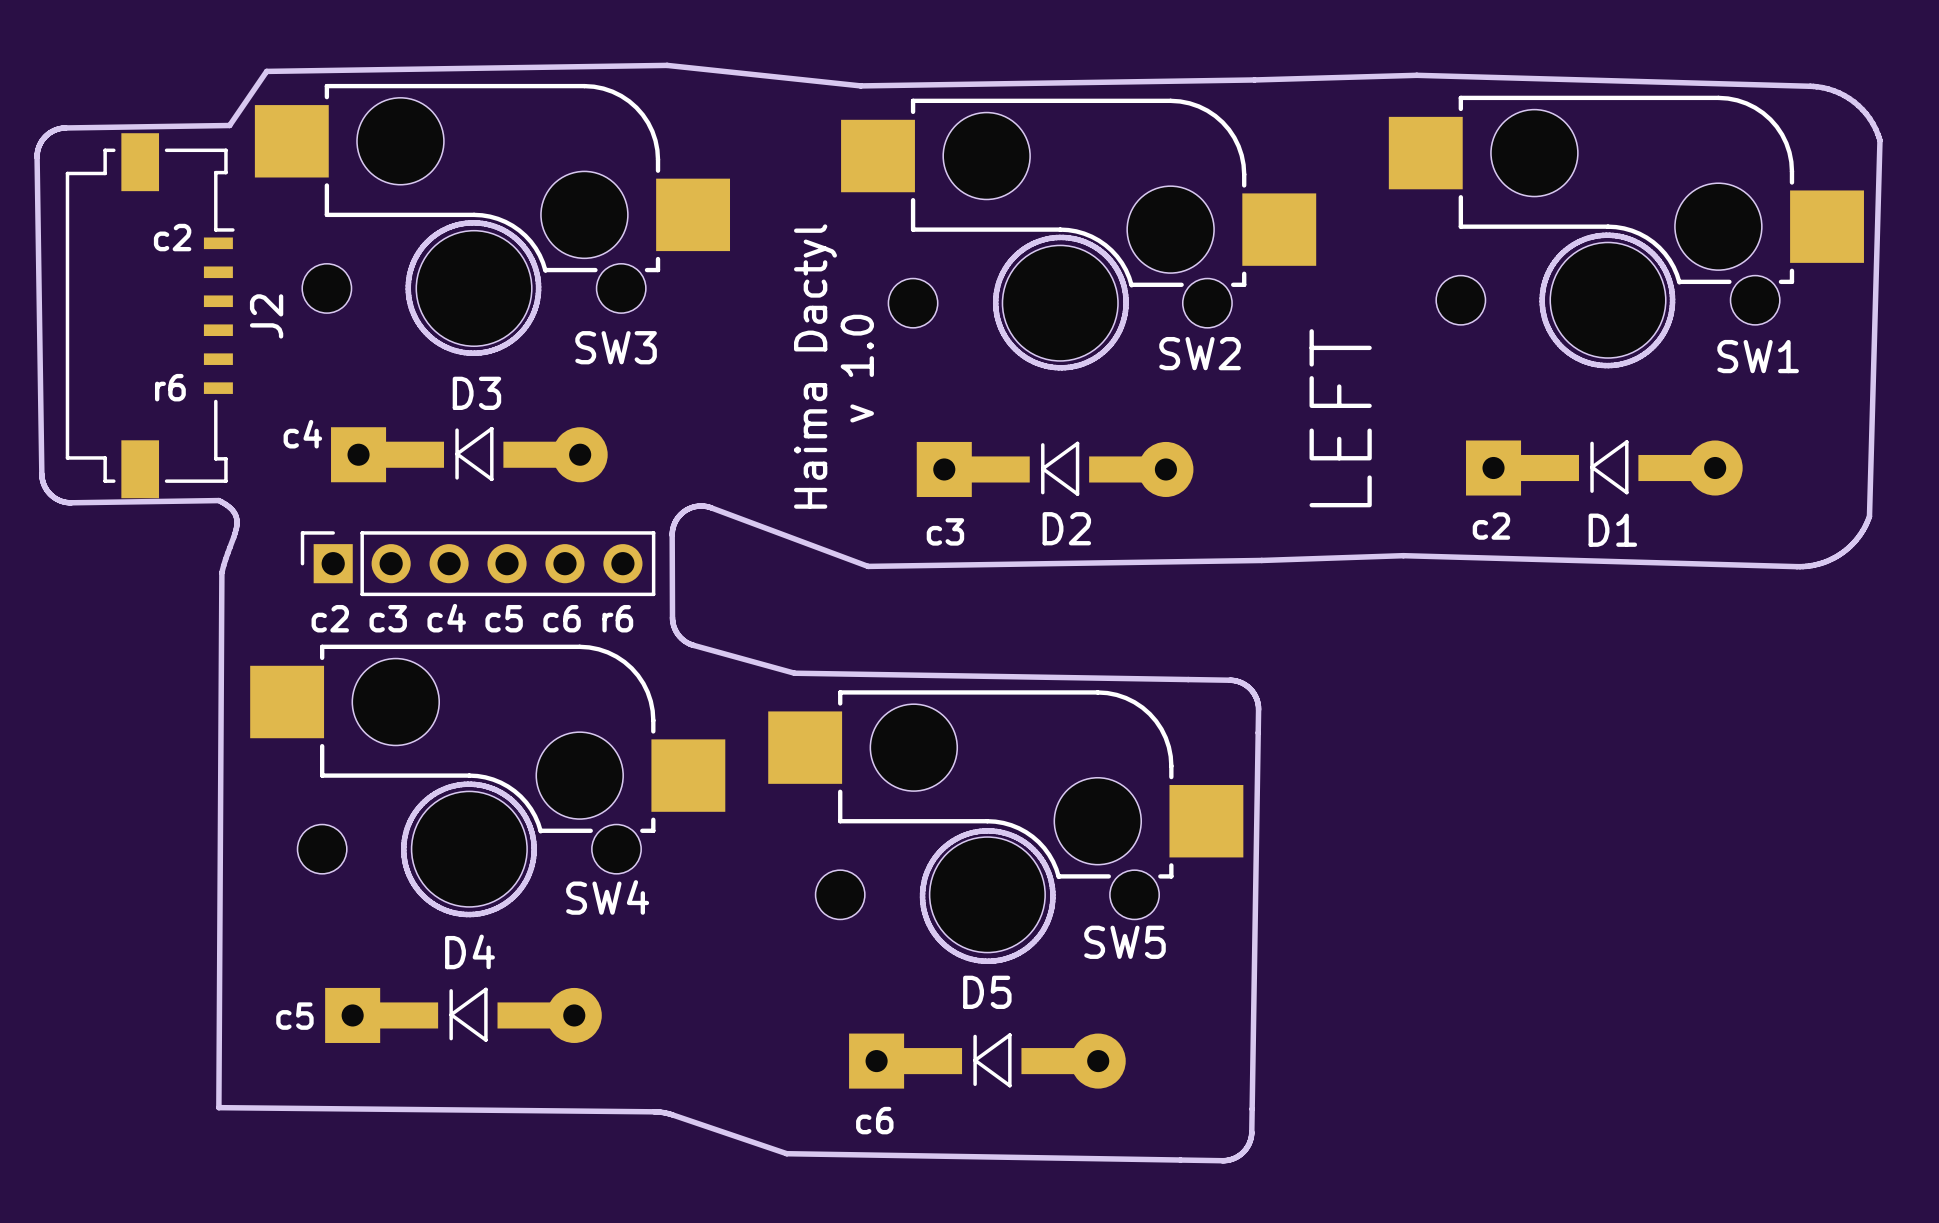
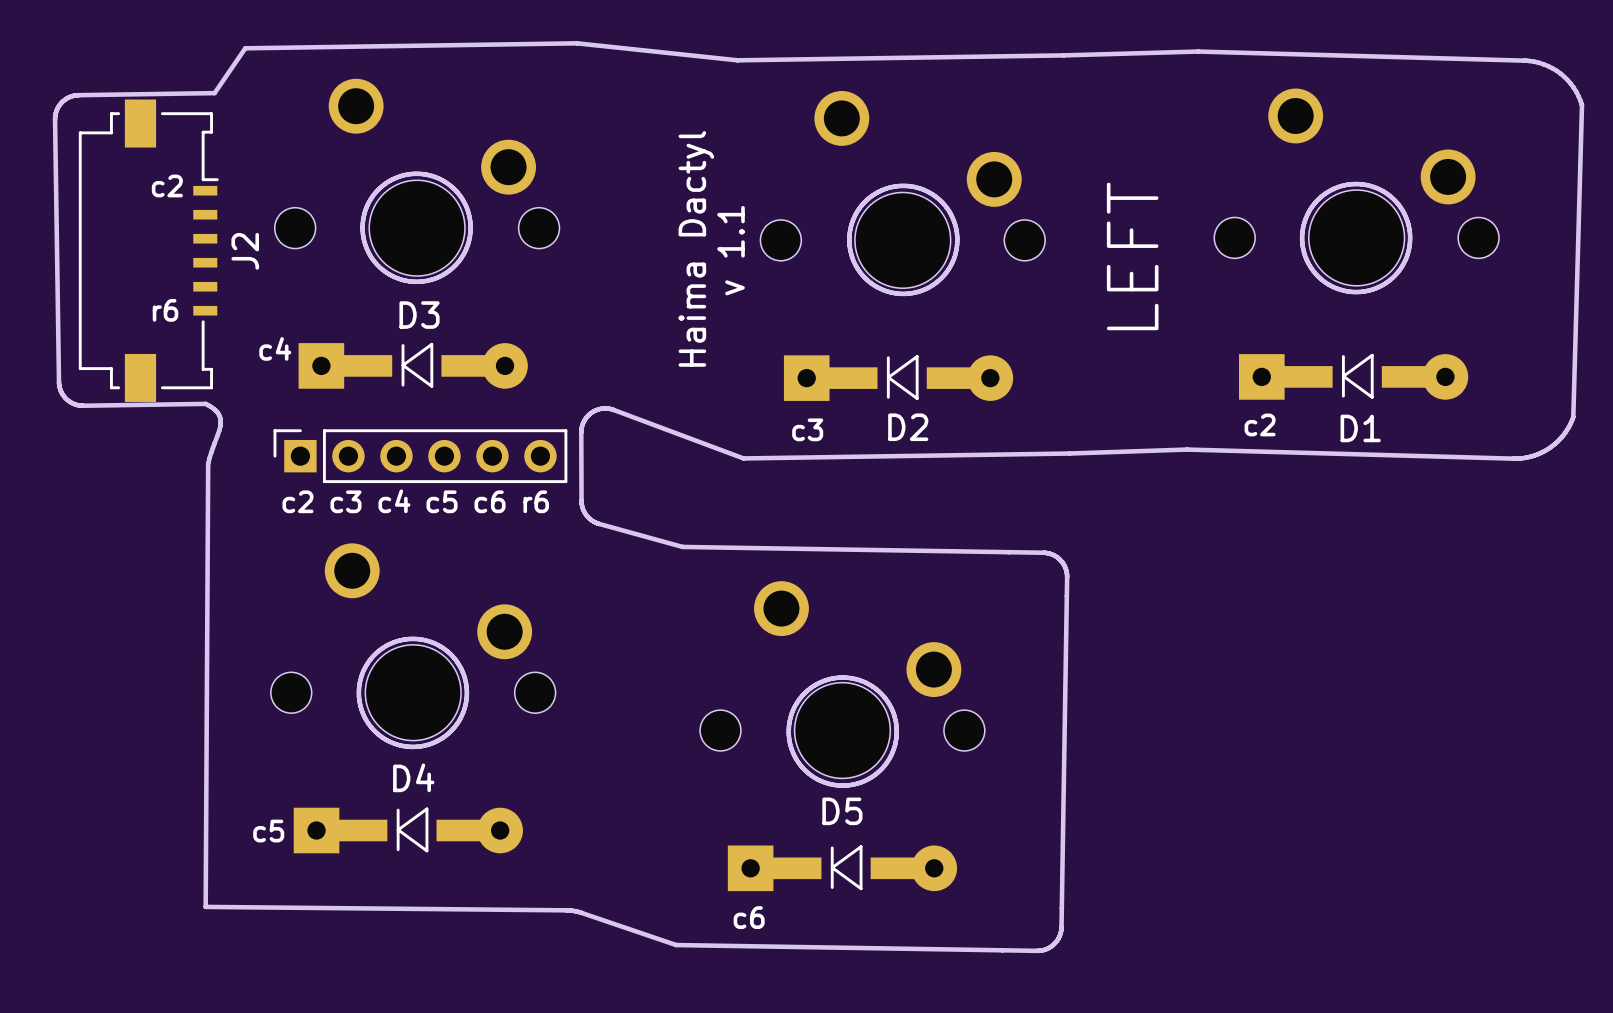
SW3: (492, 215) -> none
SW1: (1626, 226) -> none
part: none -> (417, 177)
SW2: (1078, 229) -> none
part: none -> (1356, 187)
part: none -> (902, 189)
text position: Haima Dactyl (815, 366) -> Haima Dactyl (696, 248)
text: v 1.0 (857, 368) -> v 1.1 (731, 250)
text position: LEFT (1340, 418) -> LEFT (1132, 256)
SW4: (487, 775) -> none
part: none -> (413, 641)
SW5: (1005, 821) -> none
part: none -> (842, 679)

